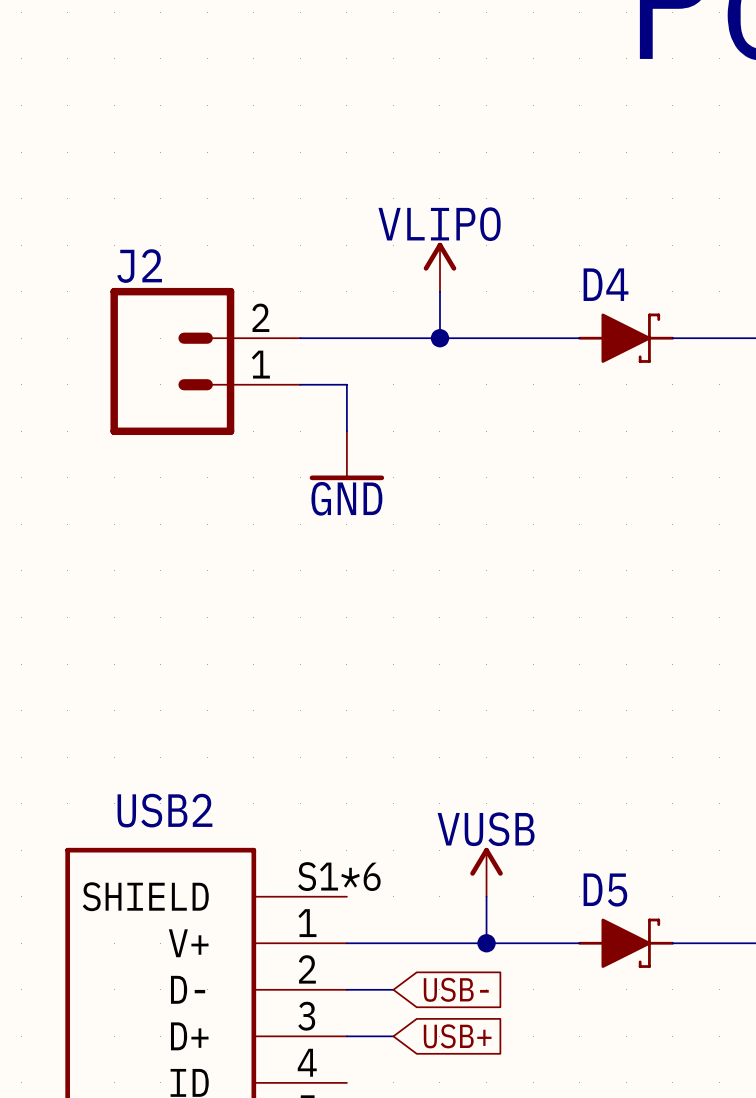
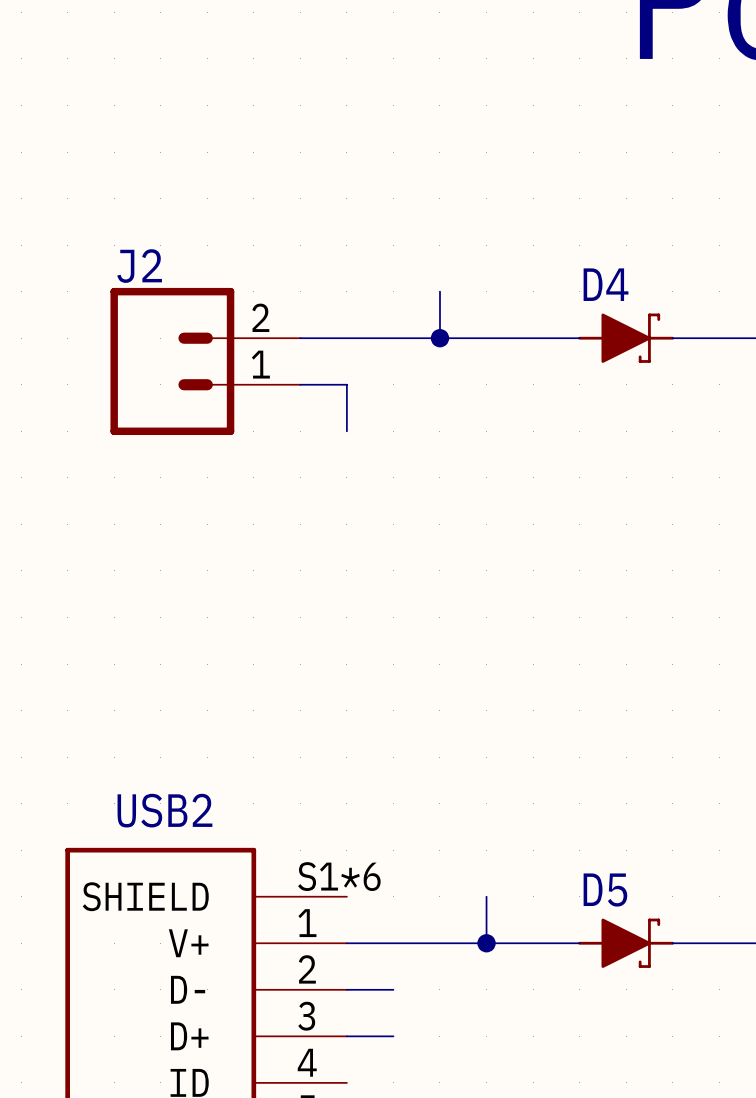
power symbol: VLIPO (439, 267) -> none
power symbol: GND (346, 455) -> none
power symbol: VUSB (486, 872) -> none
global label: USB- (456, 989) -> none
global label: USB+ (457, 1036) -> none

